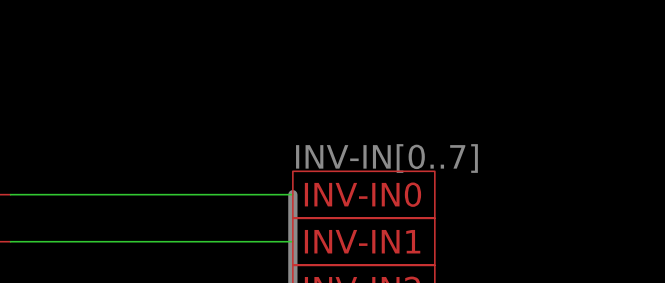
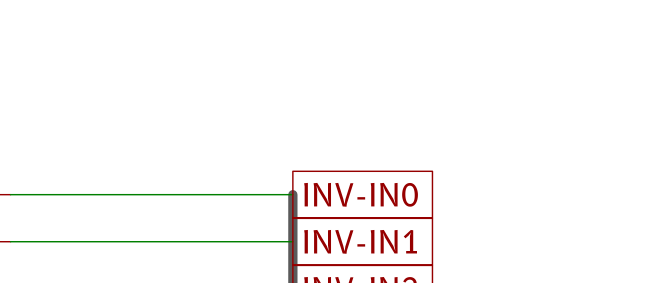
text: INV-IN[0..7] (386, 158) -> none

